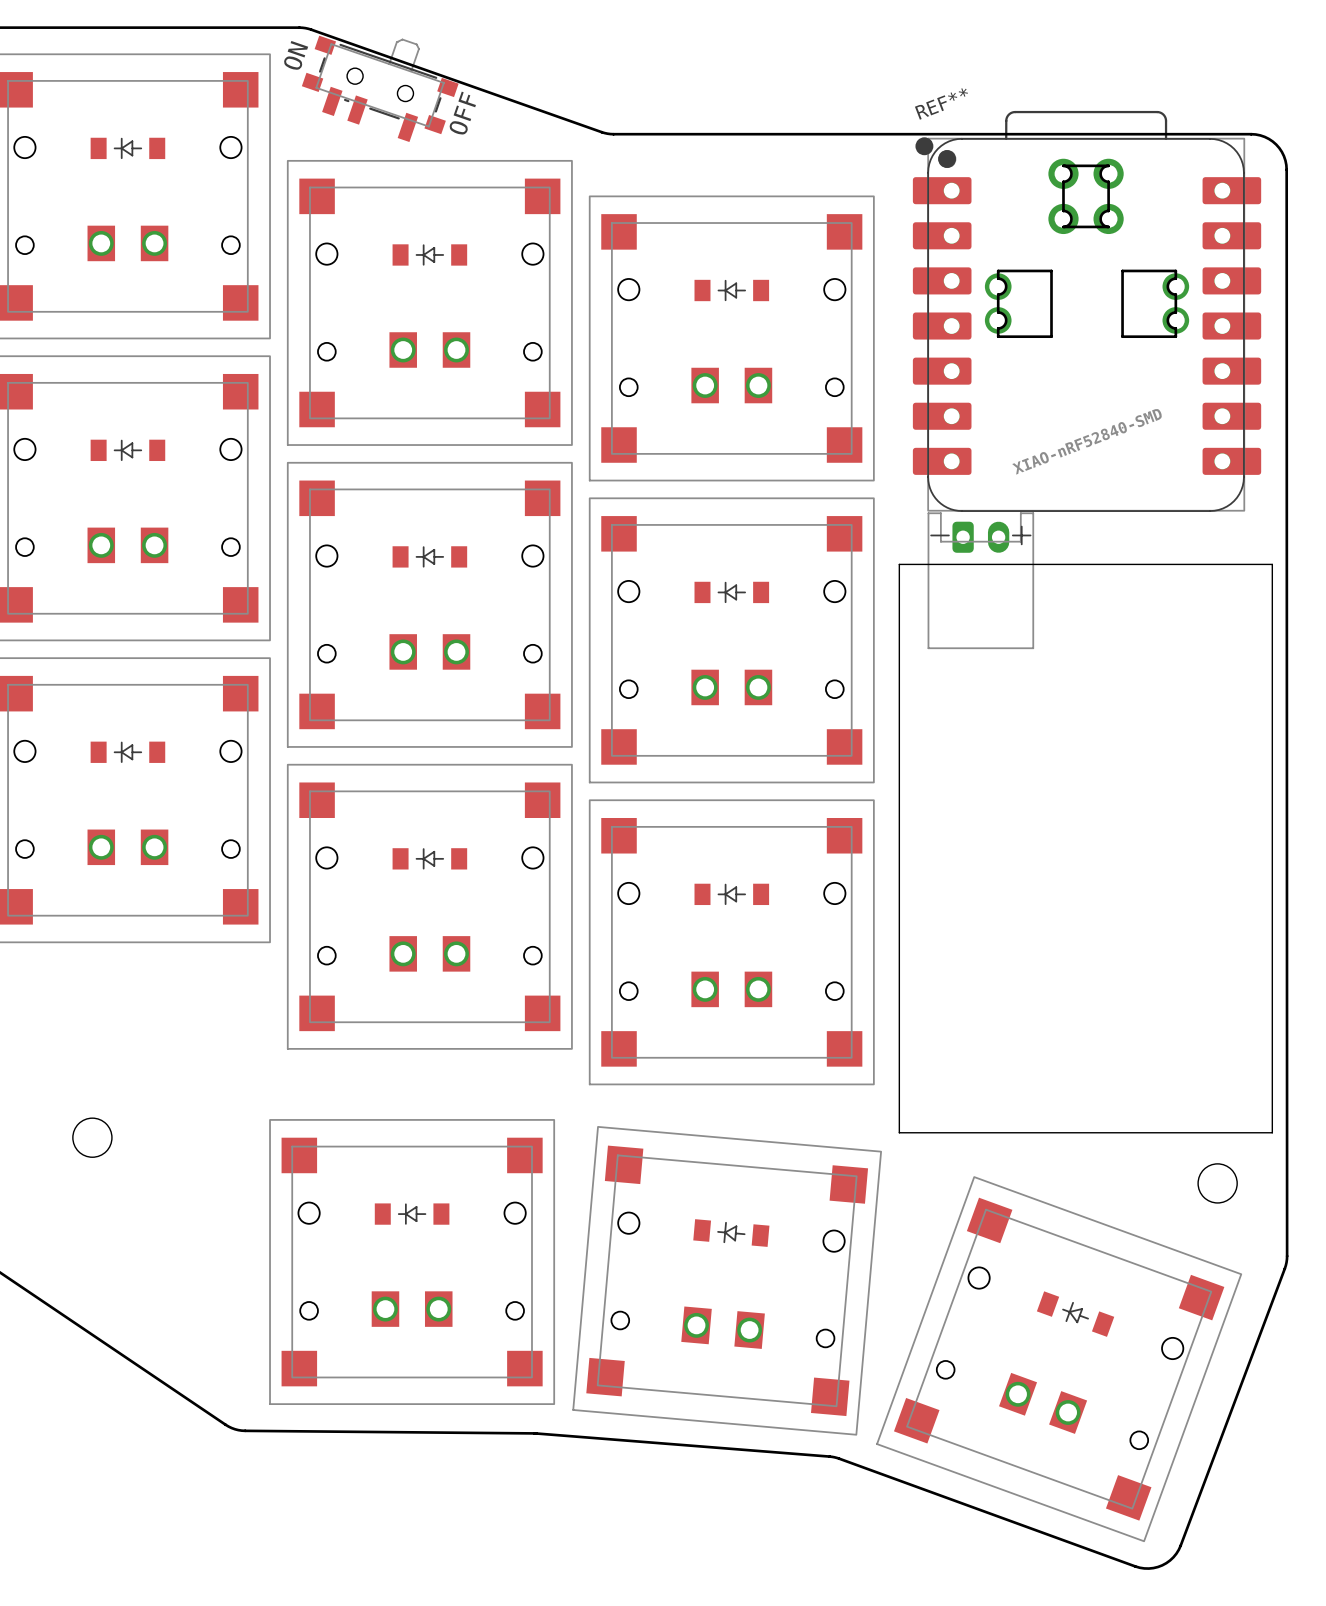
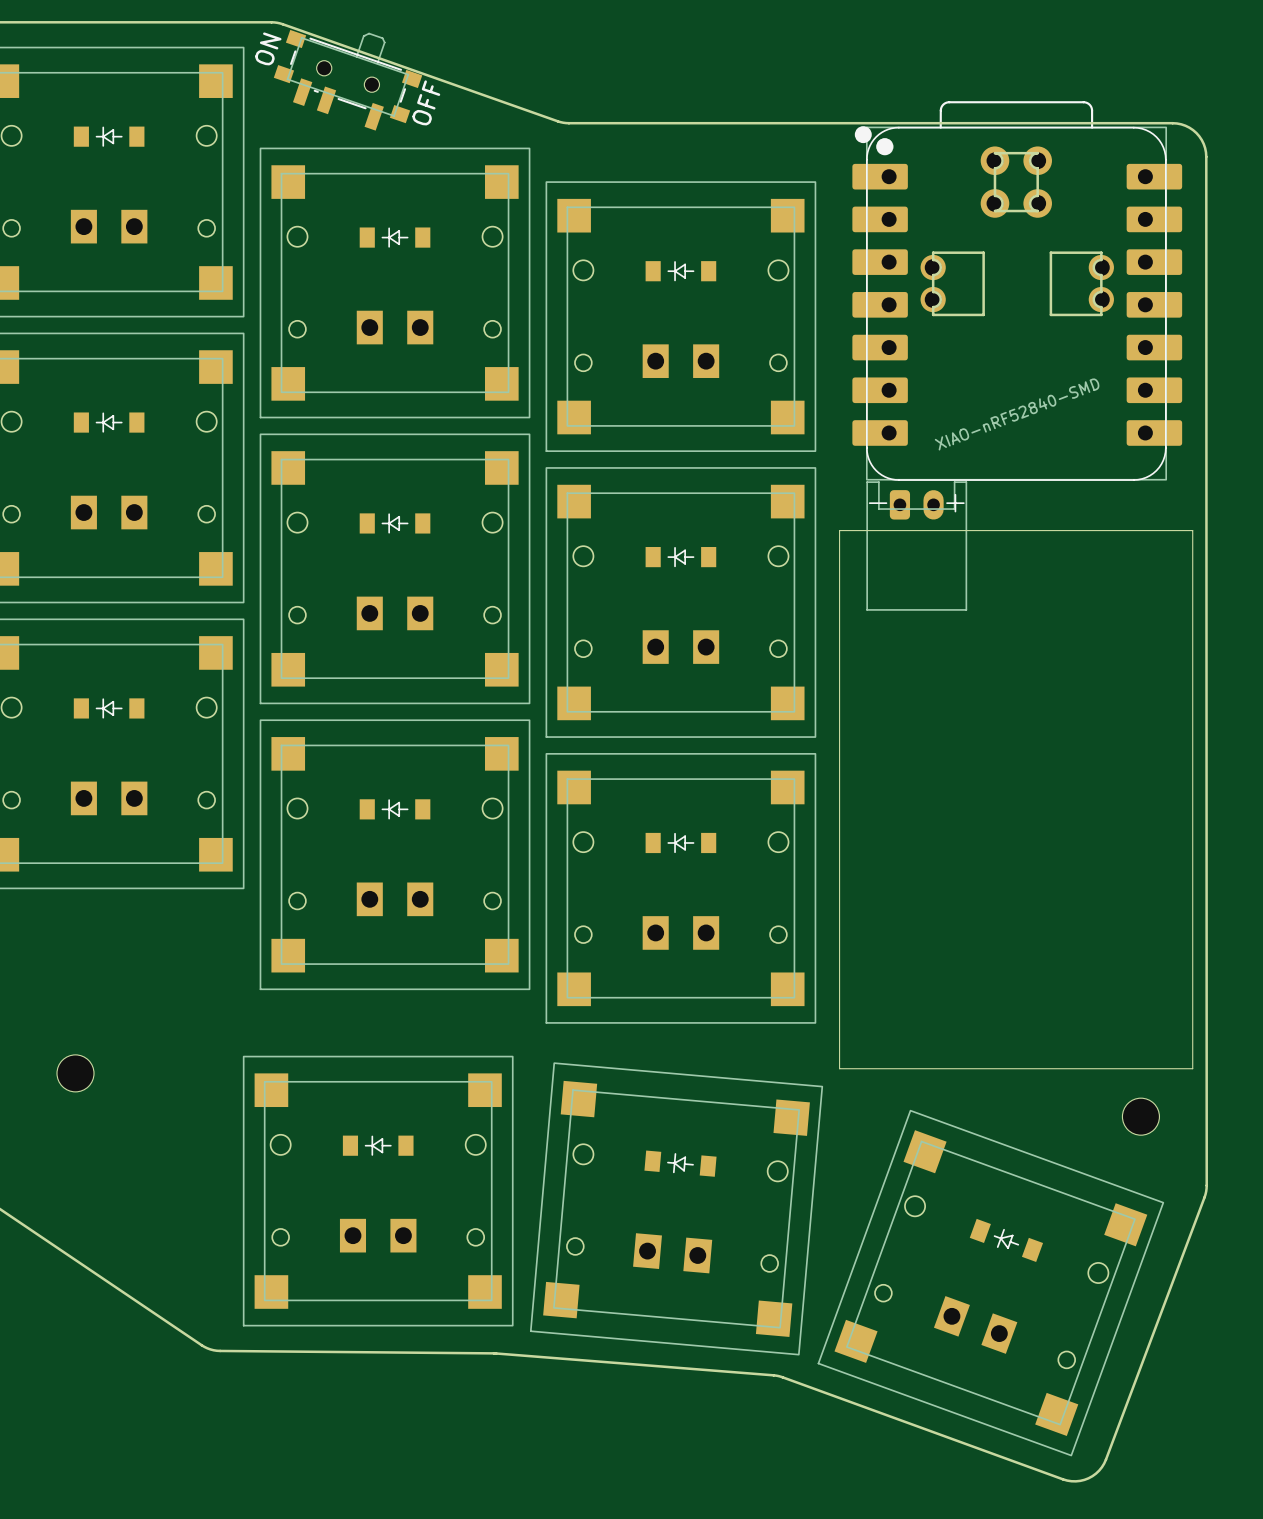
REF**: XIAO-nRF52840-SMD (1087, 311) -> none

